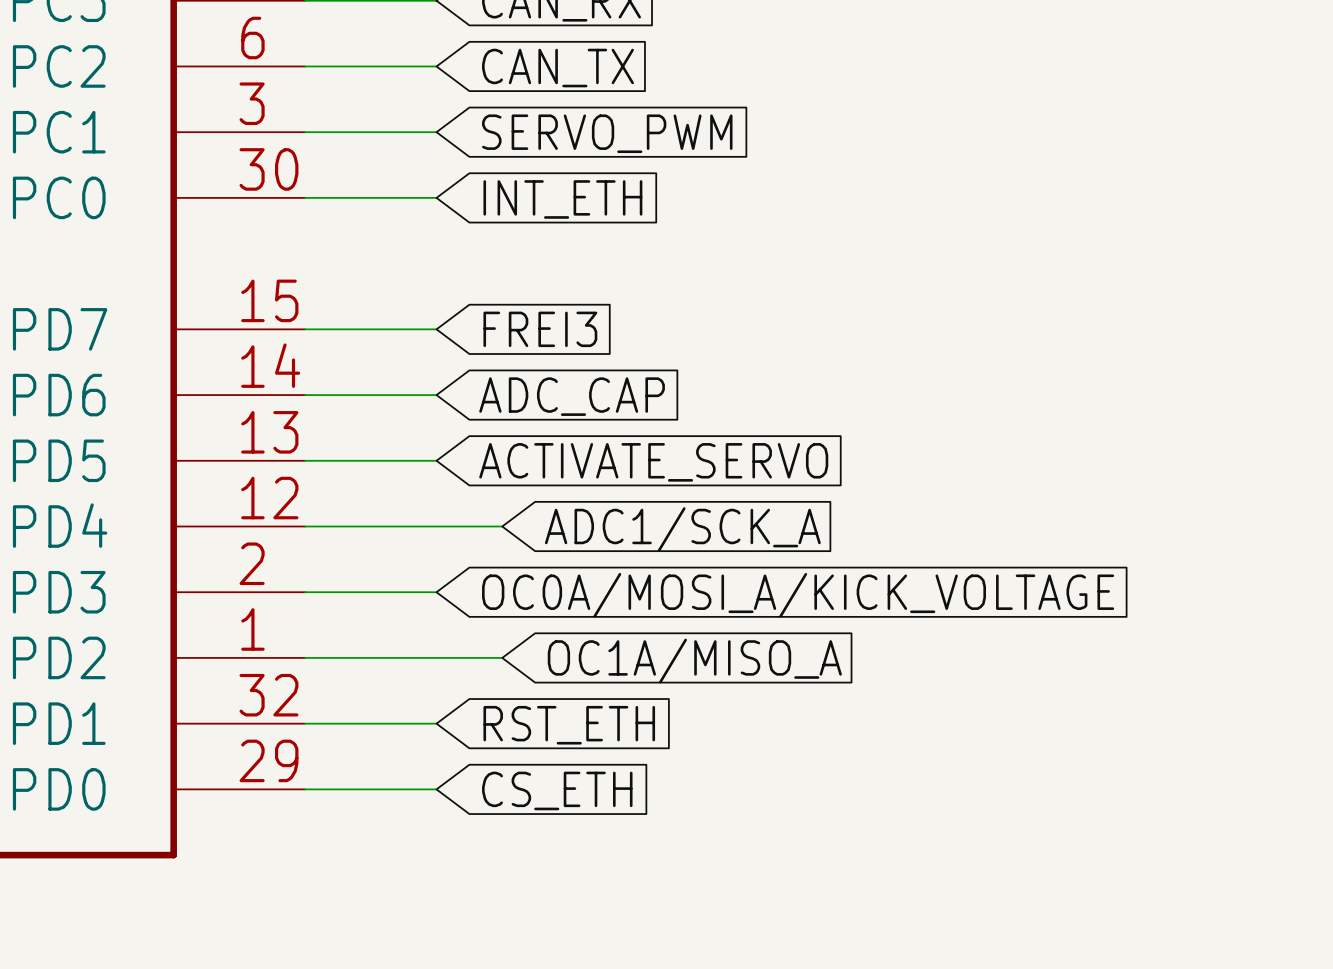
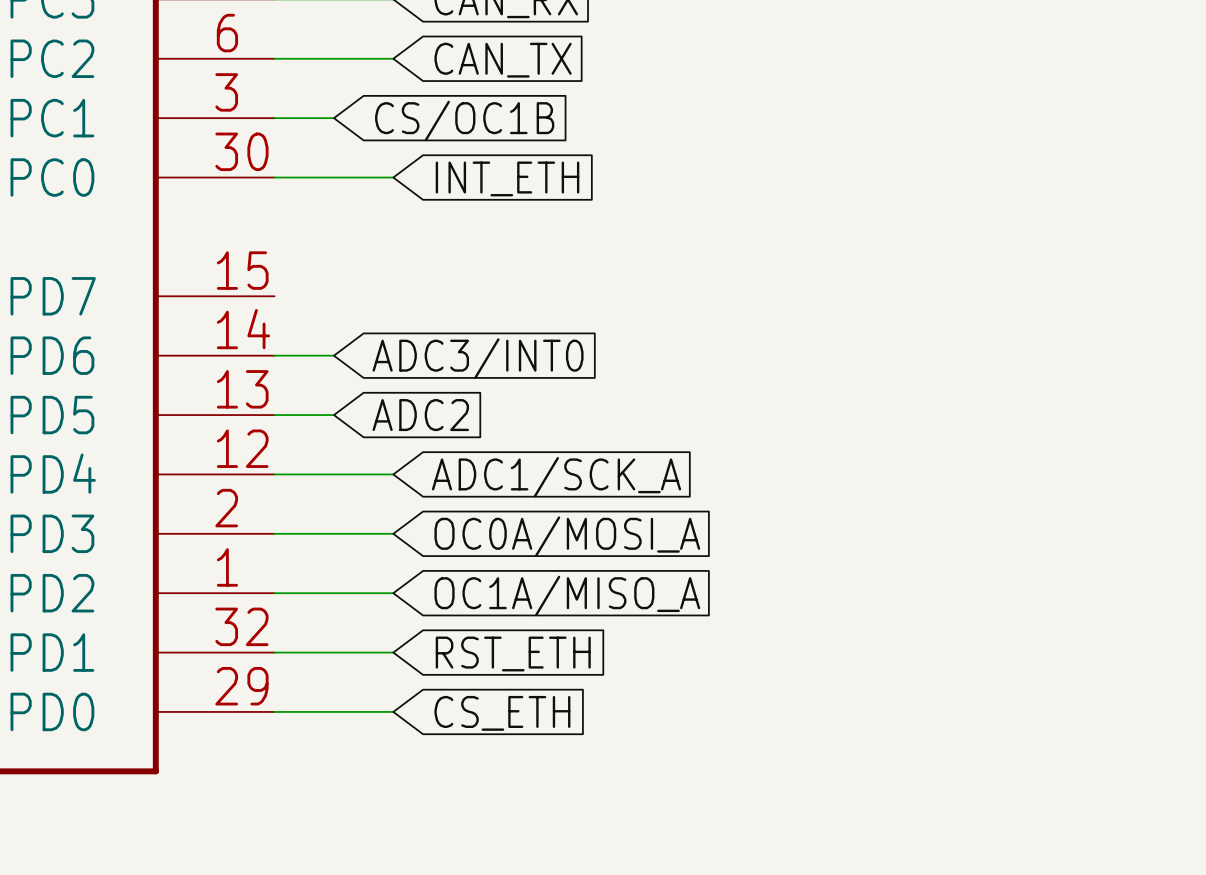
wire: (370, 132) (436, 132) -> none
global label: SERVO_PWM (607, 133) -> none
global label: none -> CS/OC1B (464, 120)
wire: (305, 329) (436, 329) -> none
global label: FREI3 (540, 329) -> none
wire: (370, 395) (436, 395) -> none
global label: ADC_CAP (572, 396) -> none
global label: none -> ADC3/INT0 (478, 358)
wire: (370, 460) (436, 460) -> none
global label: none -> ADC2 (420, 415)
global label: ACTIVATE_SERVO (653, 462) -> none
wire: (436, 526) (502, 526) -> none
global label position: ADC1/SCK_A (682, 529) -> ADC1/SCK_A (556, 477)
global label: OC0A/MOSI_A/KICK_VOLTAGE (798, 595) -> OC0A/MOSI_A (567, 536)
wire: (436, 657) (502, 657) -> none
global label position: OC1A/MISO_A (694, 661) -> OC1A/MISO_A (567, 596)

